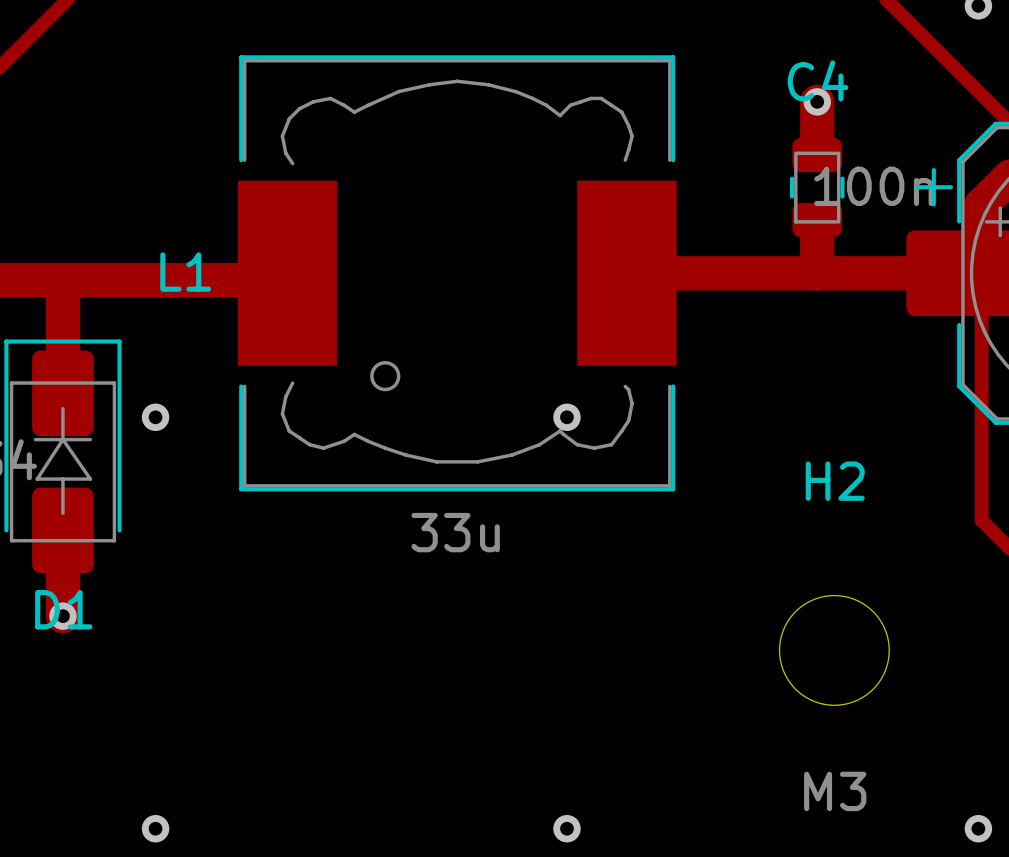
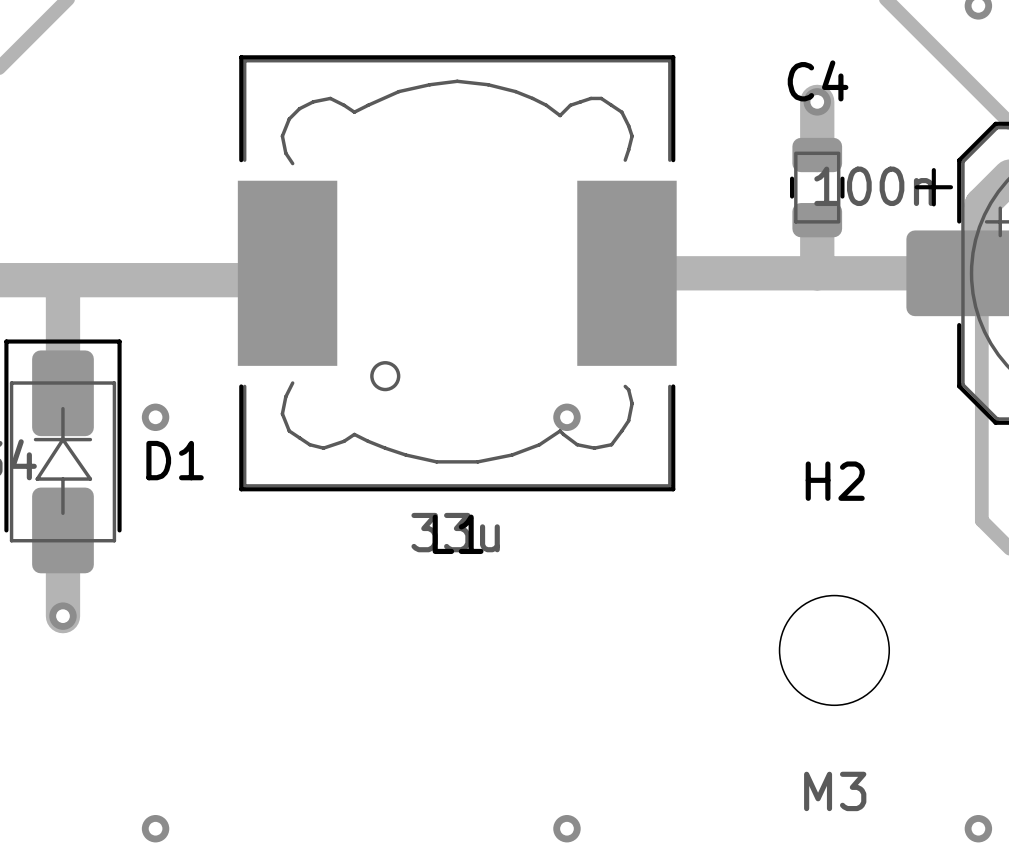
L1 name position: L1 (185, 272) -> L1 (458, 534)
D1 name position: D1 (63, 609) -> D1 (175, 460)

